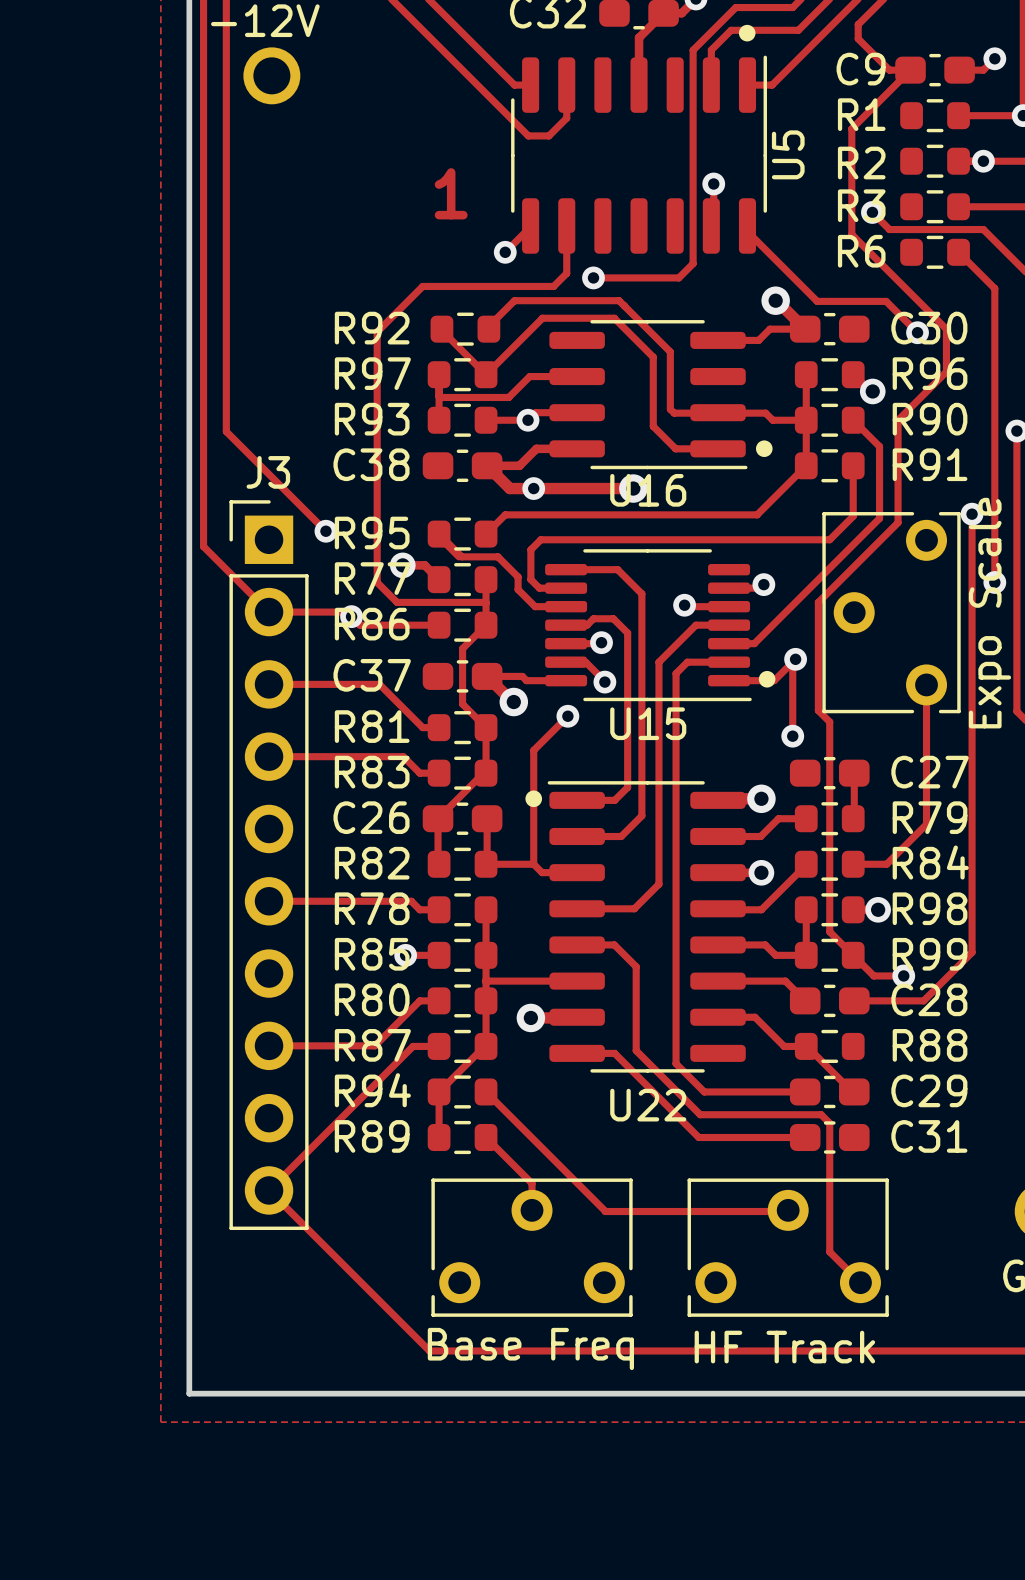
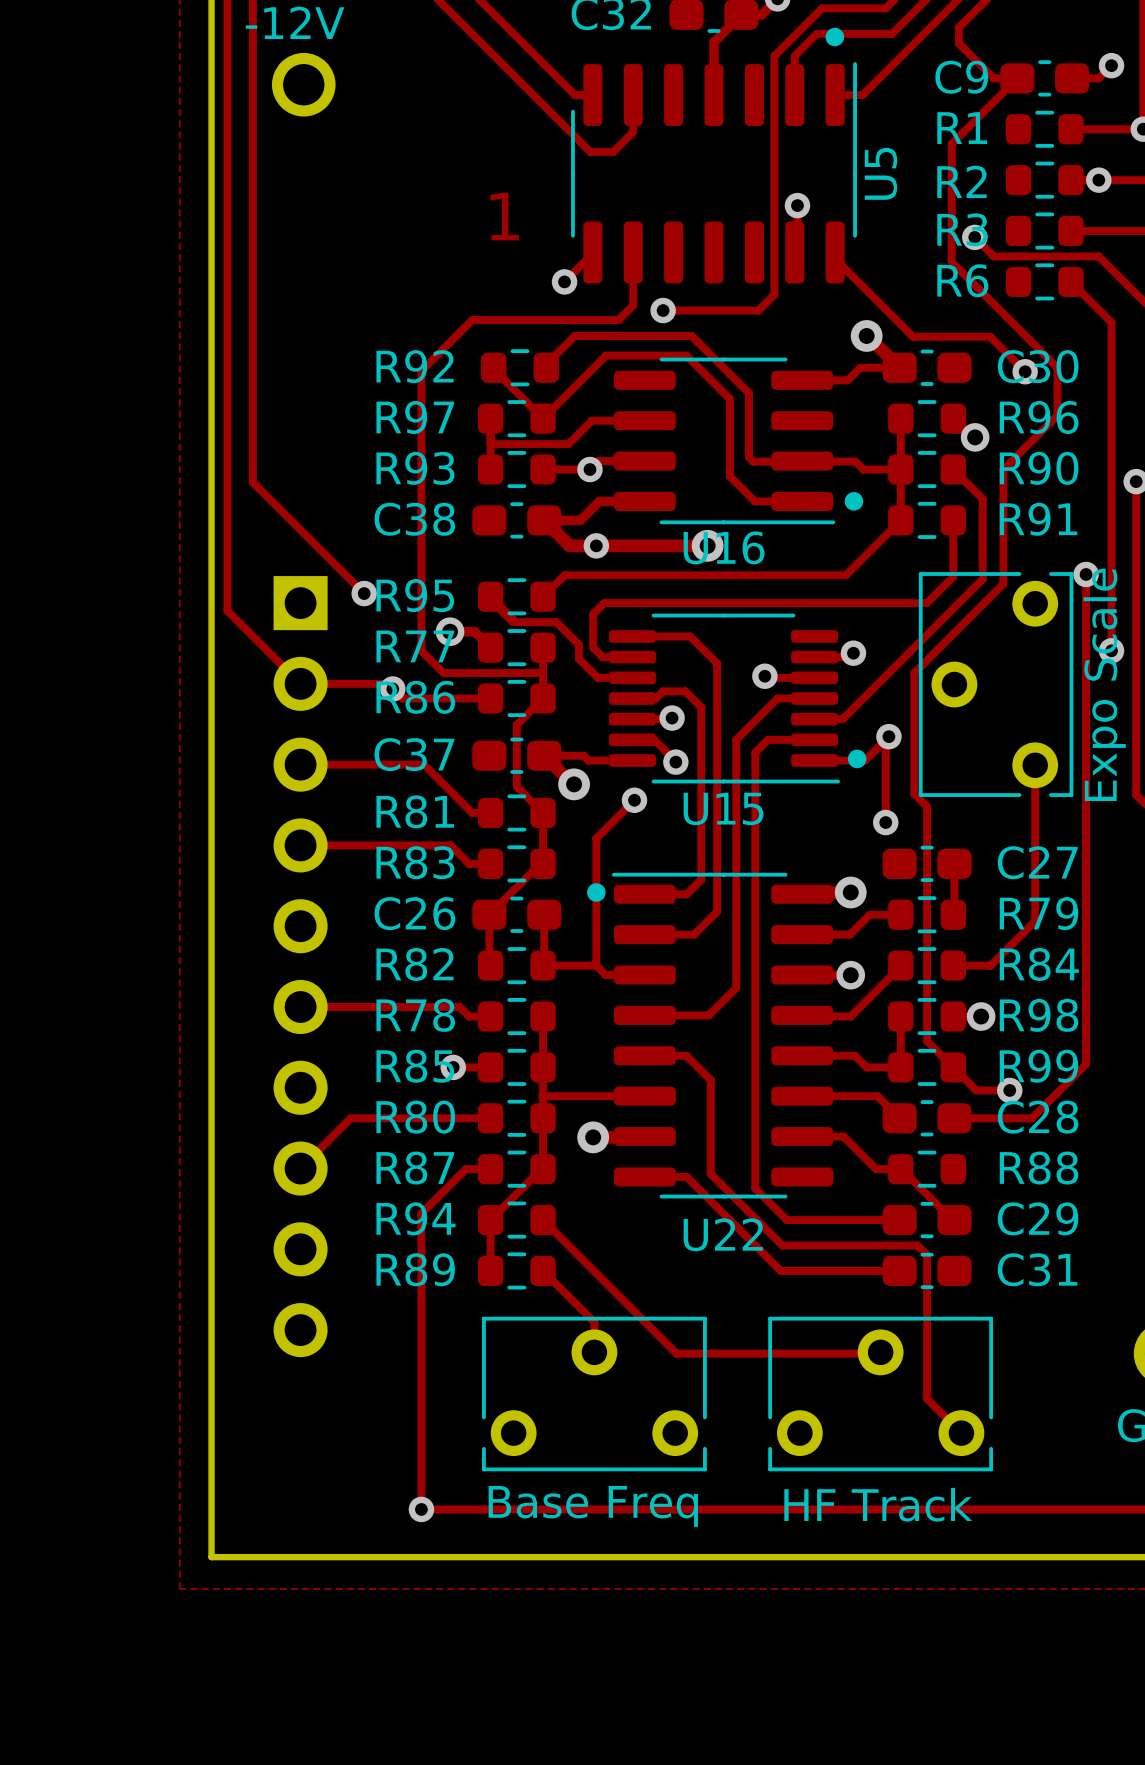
J3 side: top (269, 865) -> bottom (300, 966)
track: (419, 1000) (374, 1045) (269, 1045) -> (469, 1118) (350, 1118) (300, 1168)
track: (417, 1046) (413, 1046) (269, 1190) (429, 1350) -> (465, 1169) (421, 1213) (421, 1509) (479, 1509)
via: none -> (421, 1509)

